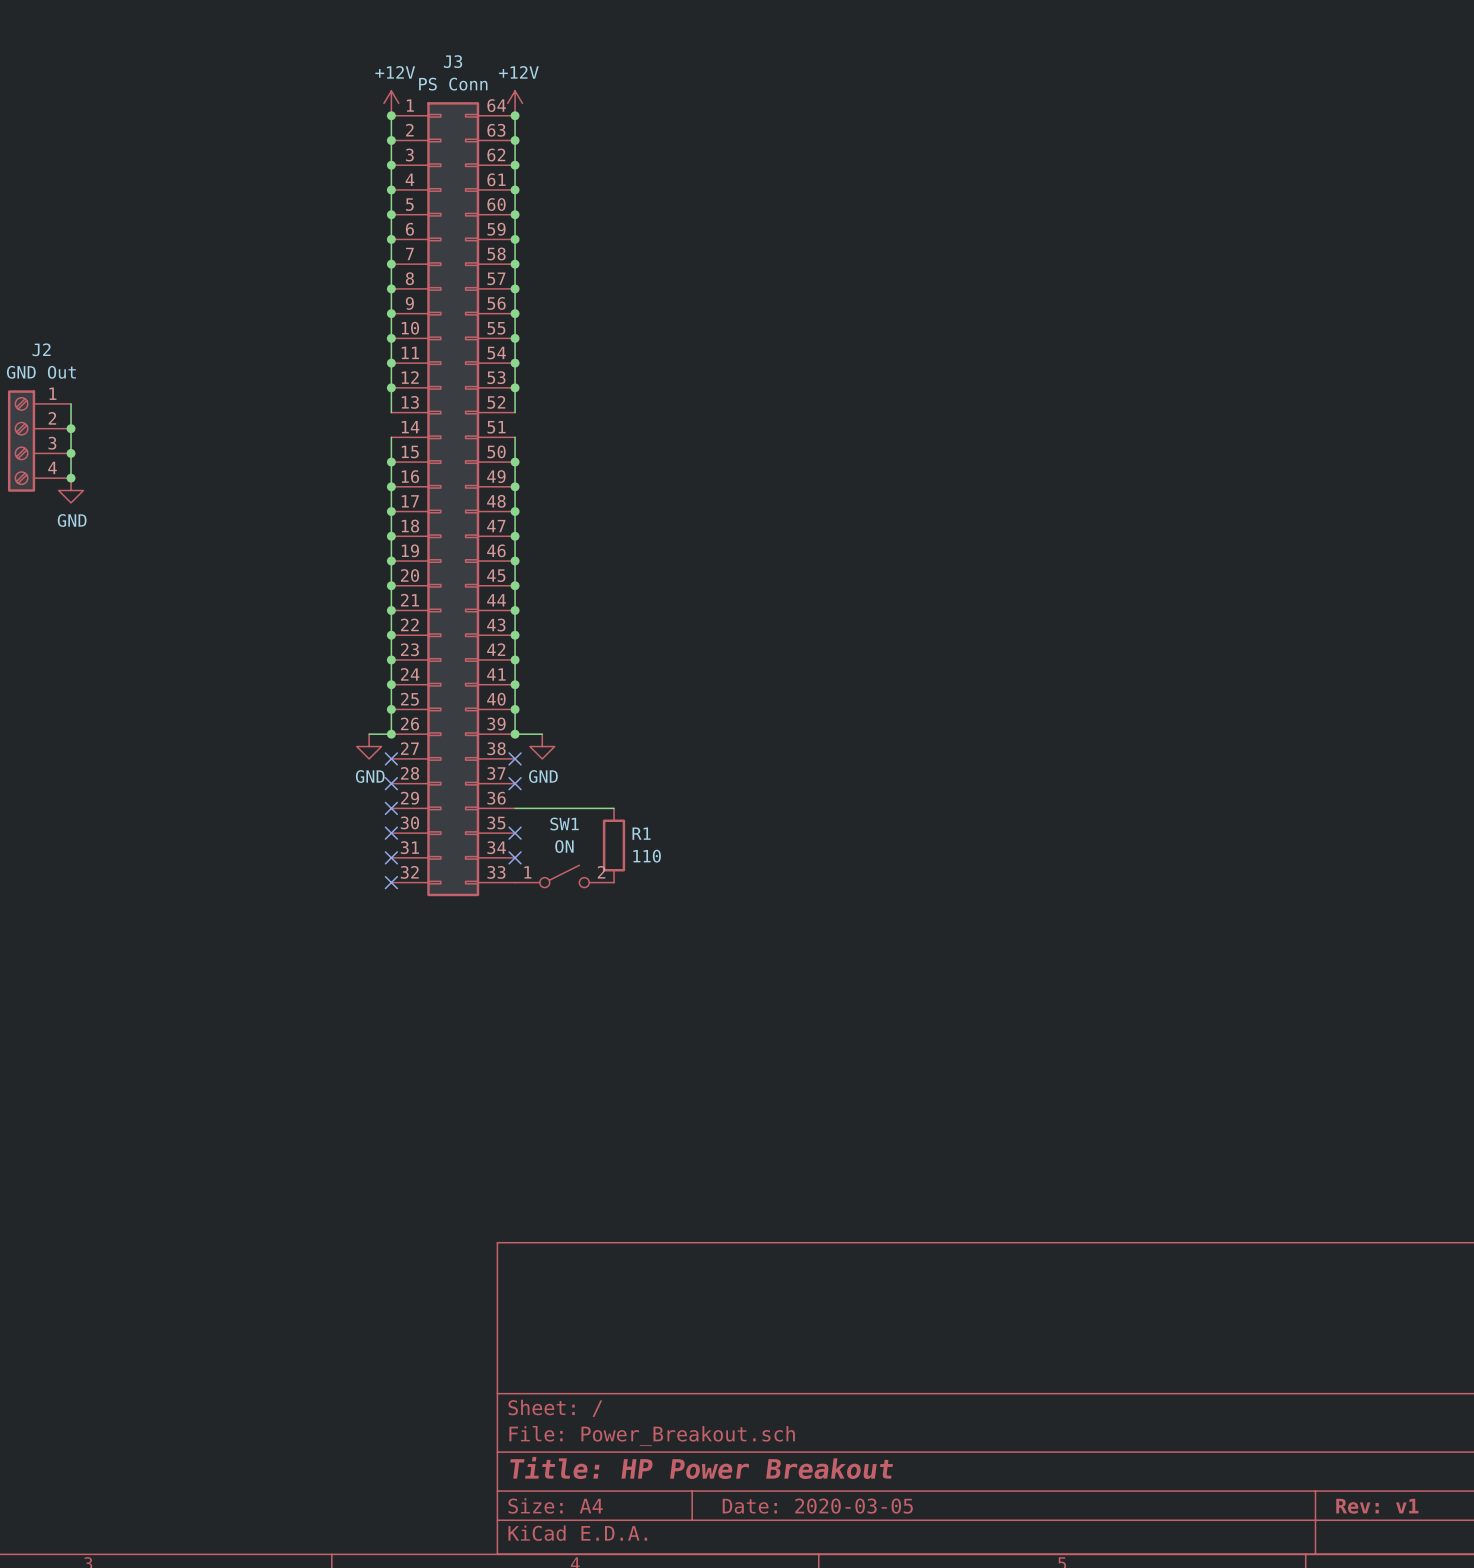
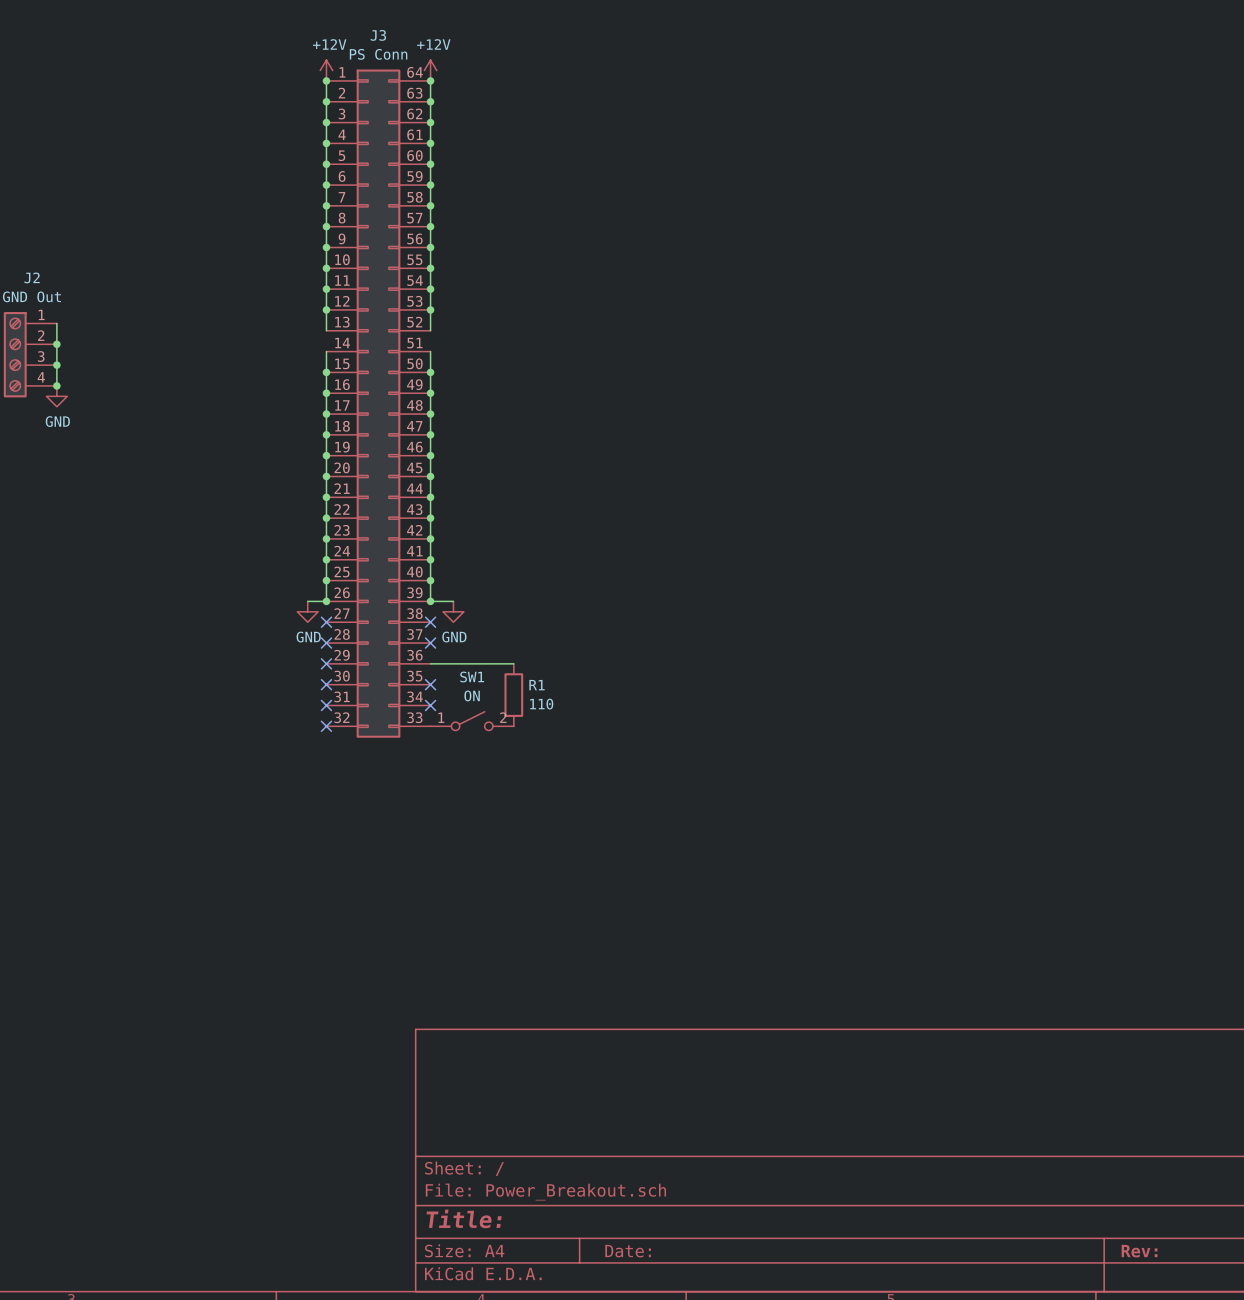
title block: Title: HP Power Breakout (701, 1467) -> Title: (464, 1218)
title block: Date: 2020-03-05 (817, 1506) -> Date: (628, 1251)
title block: Rev: v1 (1377, 1506) -> Rev: (1139, 1251)

